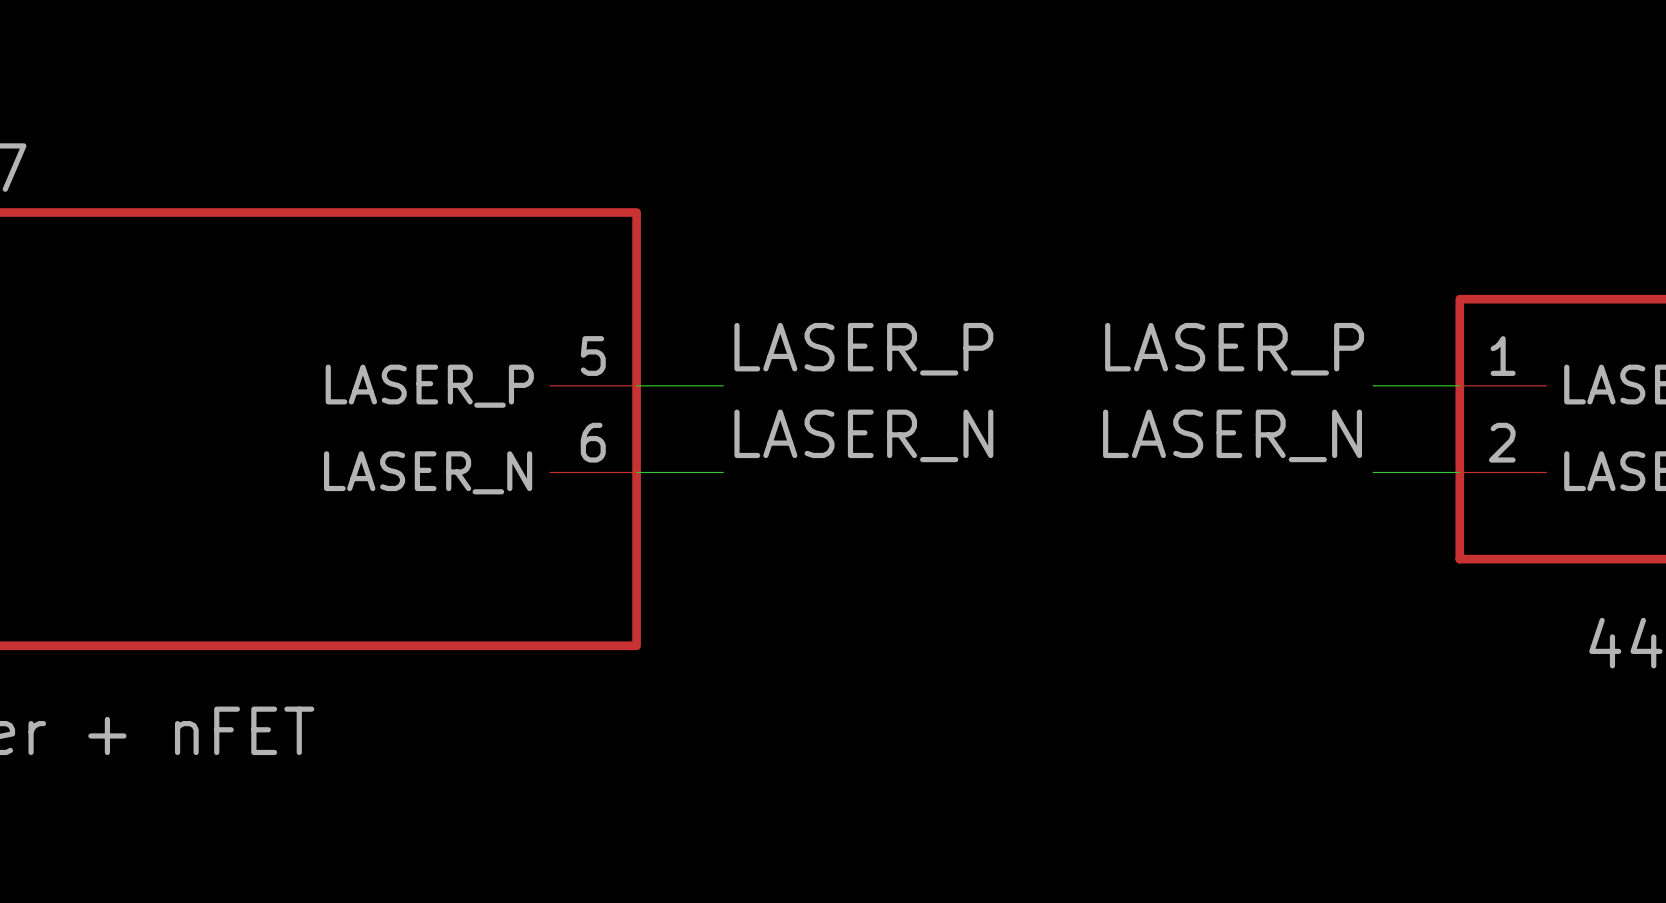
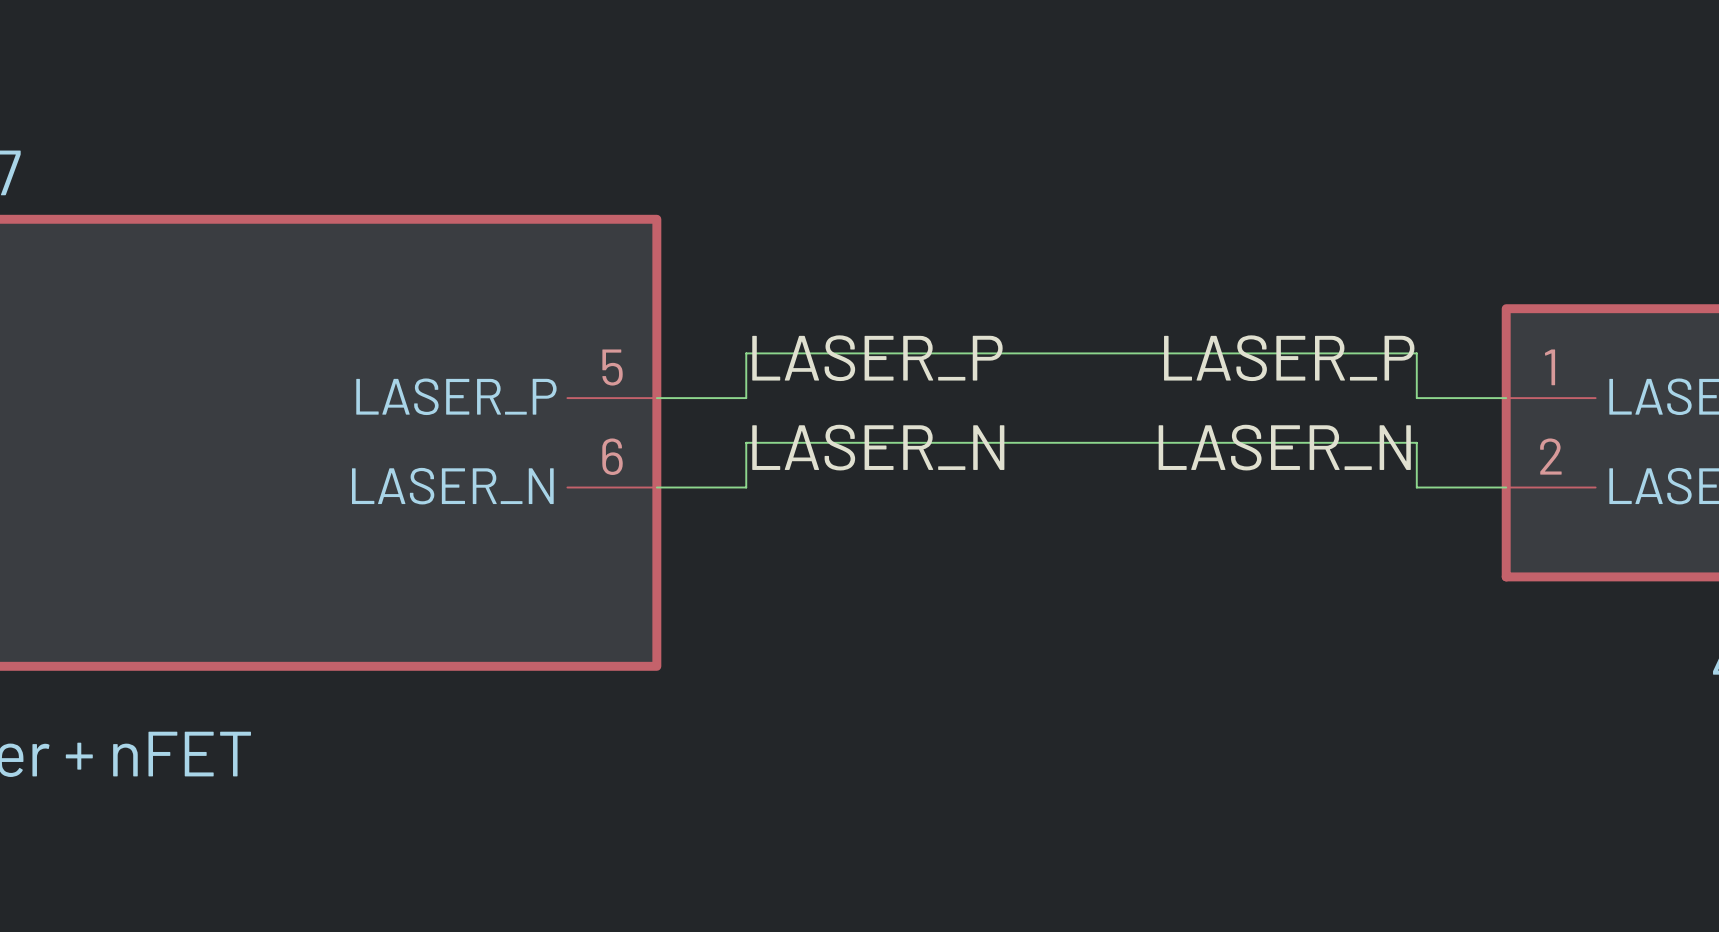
wire: none -> (746, 398) (746, 353) (1416, 353) (1416, 398)
wire: none -> (746, 487) (746, 442) (1416, 442) (1416, 487)

